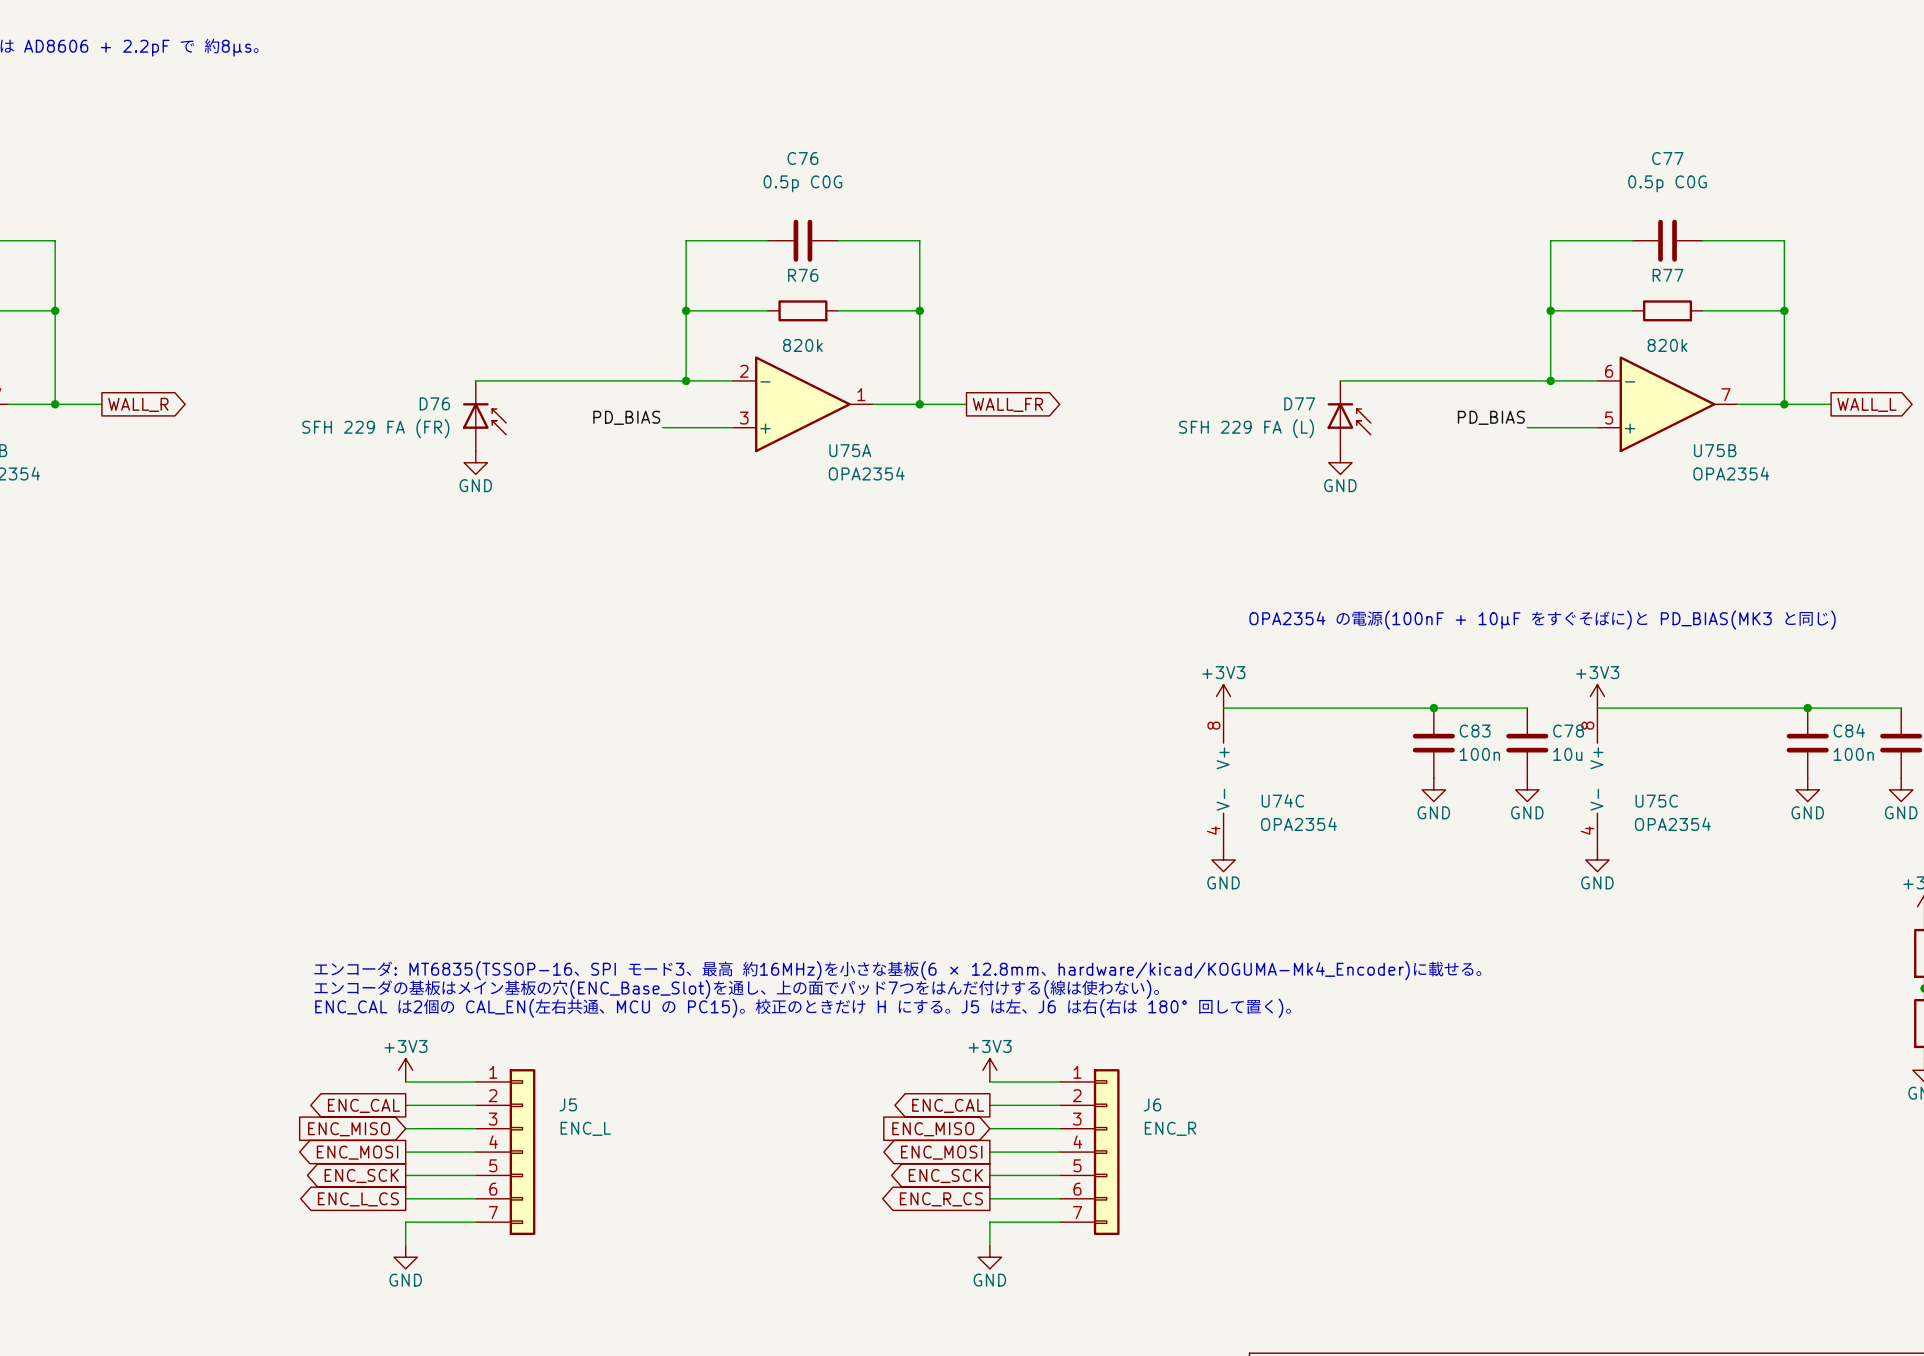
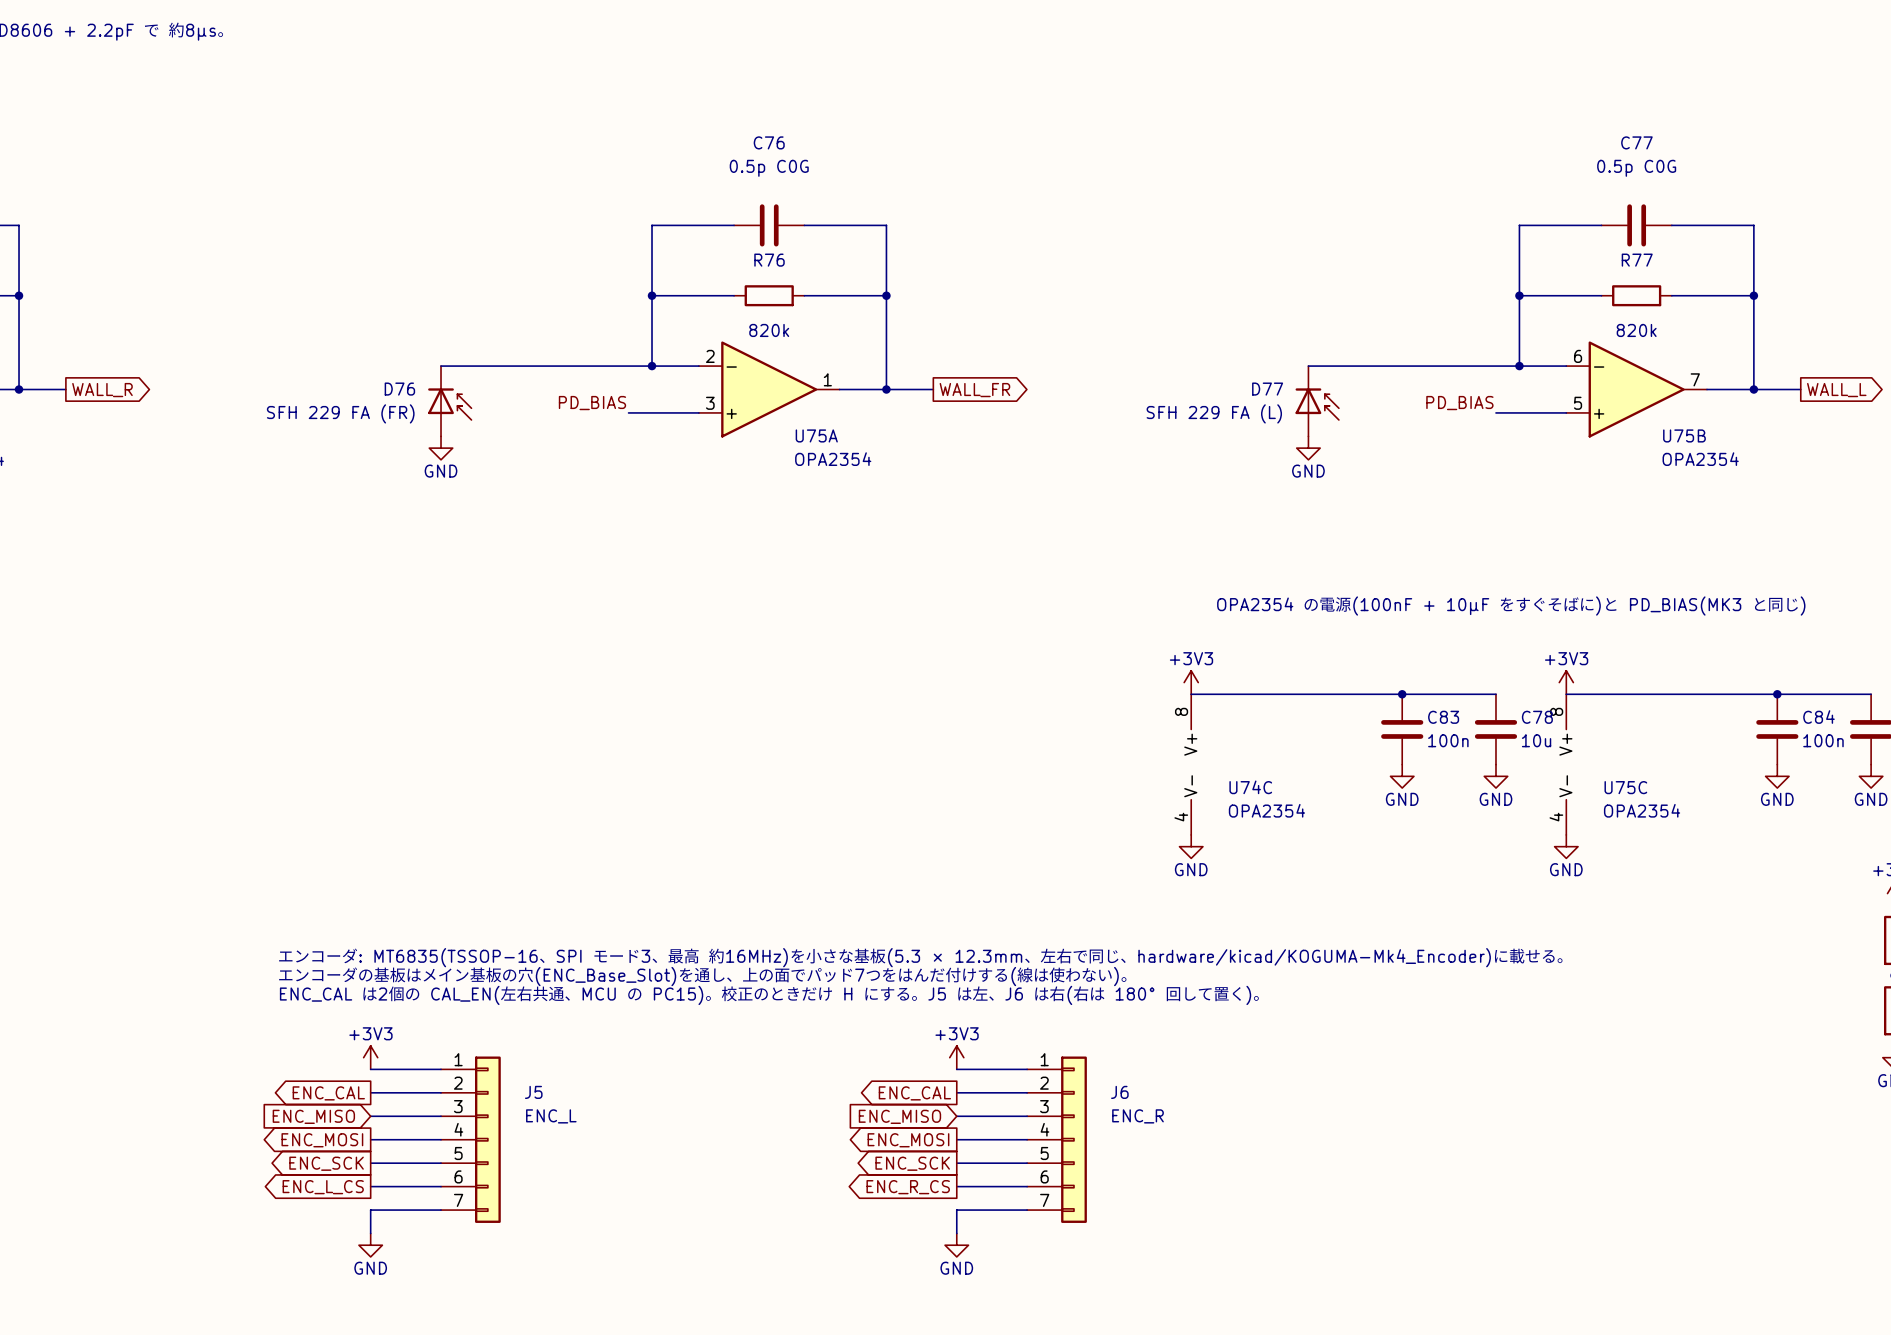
text: エンコーダ: MT6835(TSSOP-16、SPI モード3、最高 約16MHz)を小さな基板(6 × 12.8mm、hardware/kicad/KOGUMA-Mk4_Encoder)に載せる。 (897, 970) -> エンコーダ: MT6835(TSSOP-16、SPI モード3、最高 約16MHz)を小さな基板(5.3 × 12.3mm、左右で同じ、hardware/kicad/KOGUMA-Mk4_Encoder)に載せる。 (920, 957)

